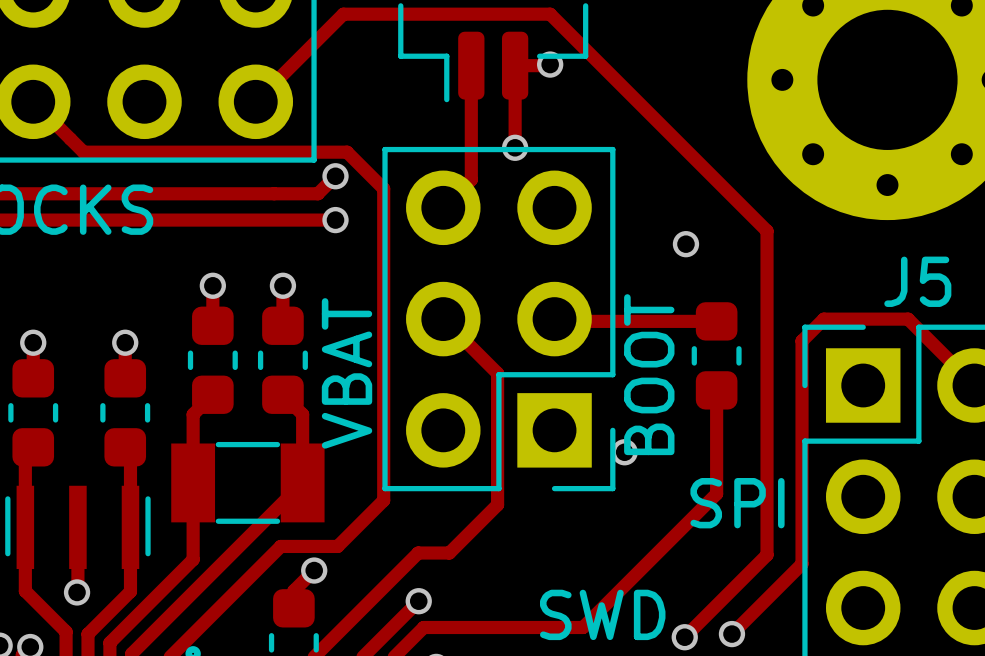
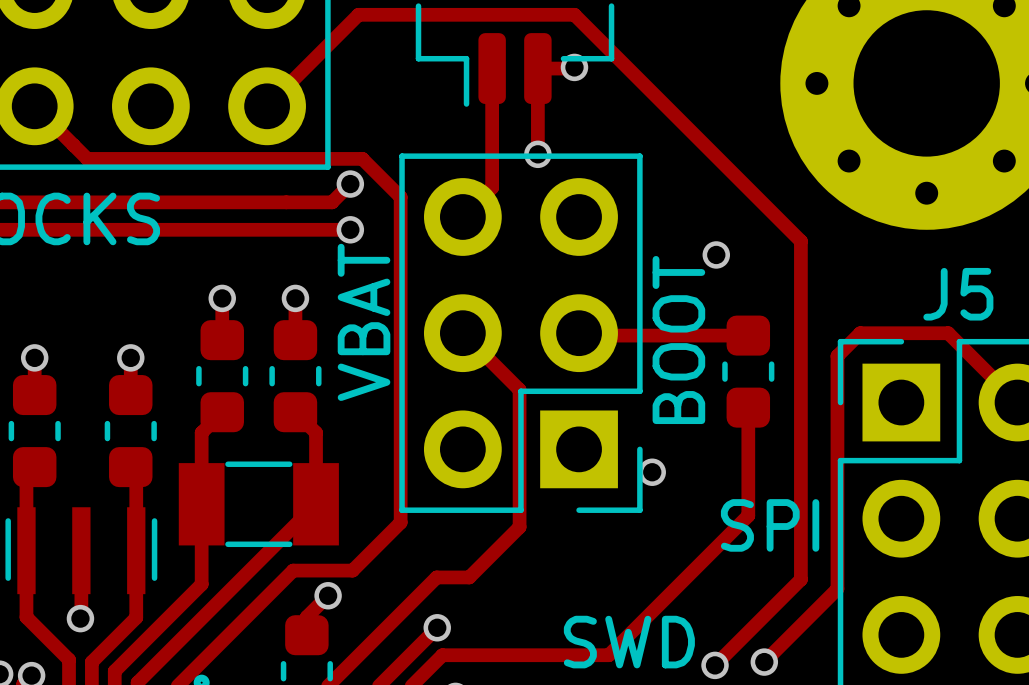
text position: VBAT (347, 373) -> VBAT (364, 322)
text position: BOOT (649, 374) -> BOOT (678, 340)

